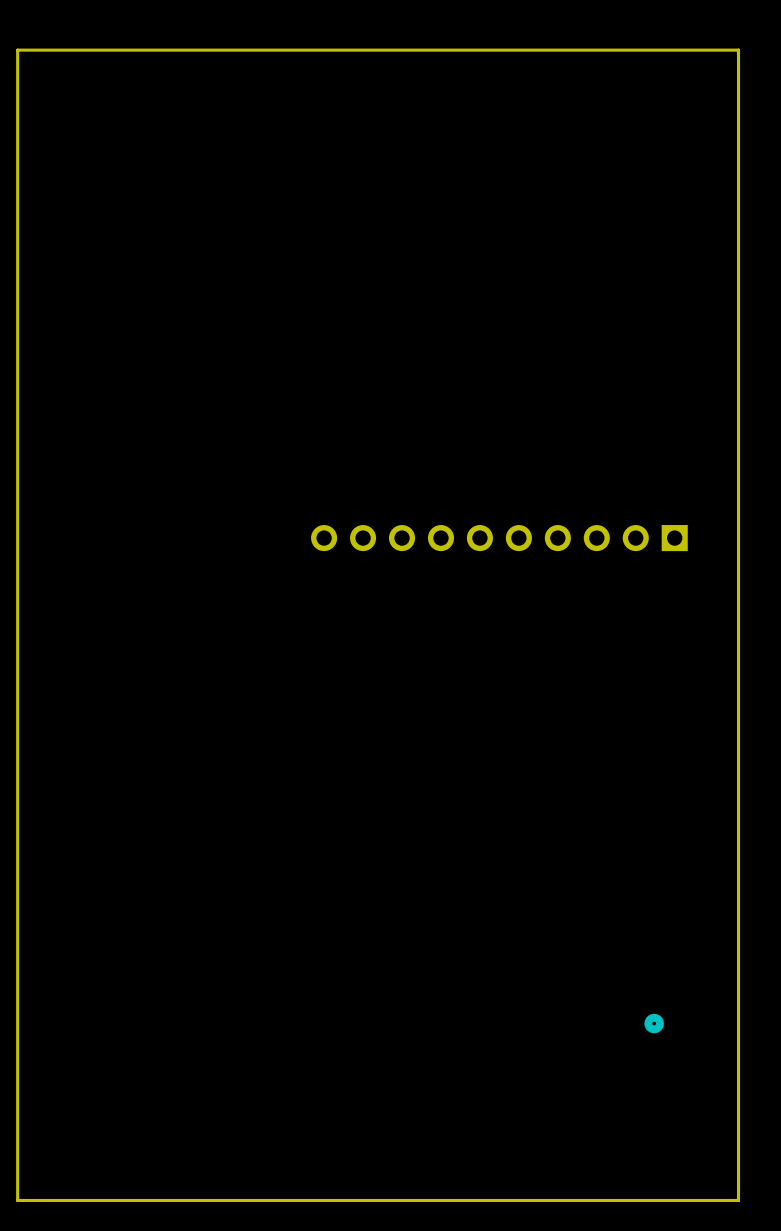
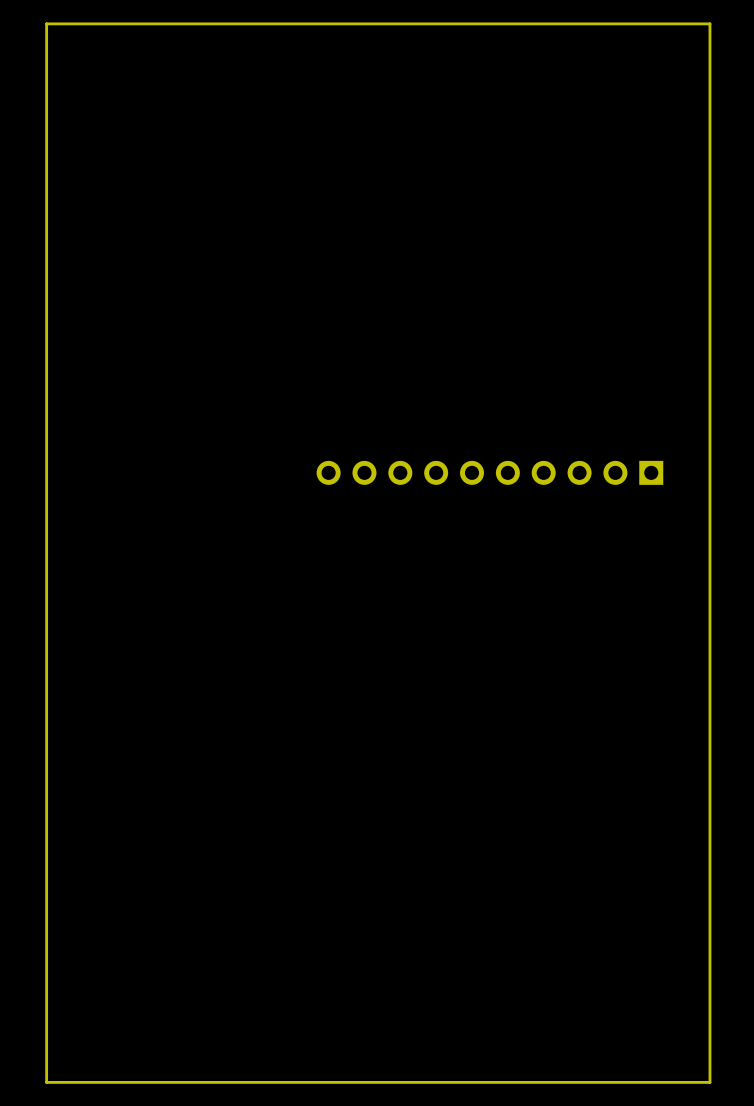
part: (654, 1023) -> none

